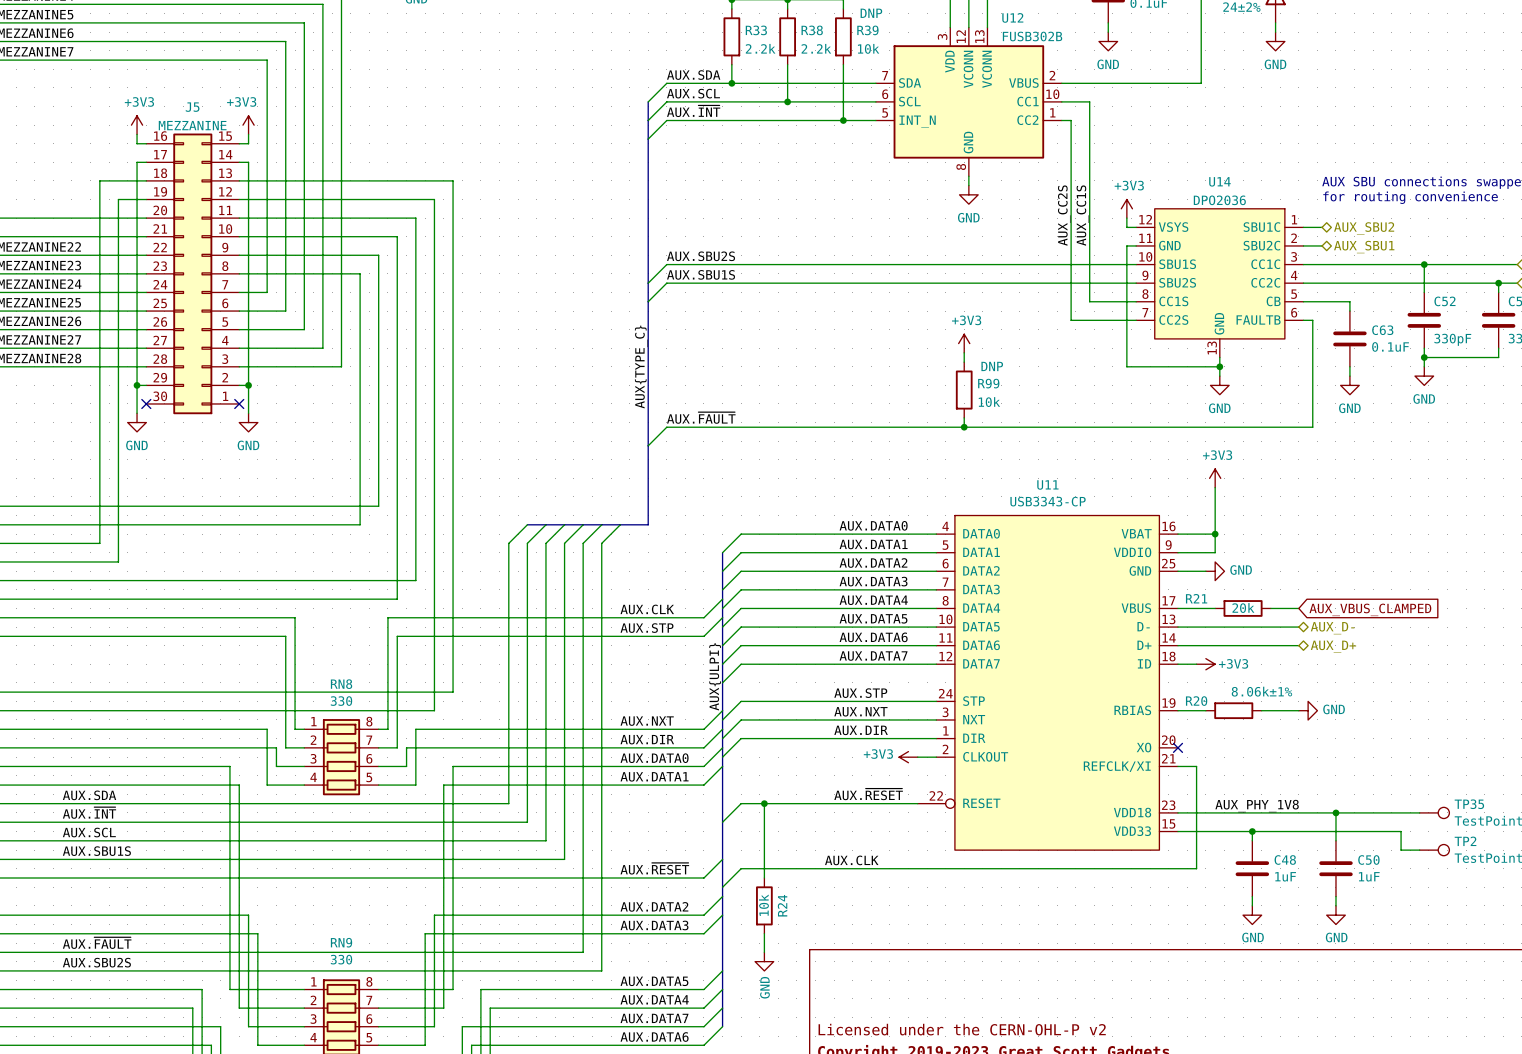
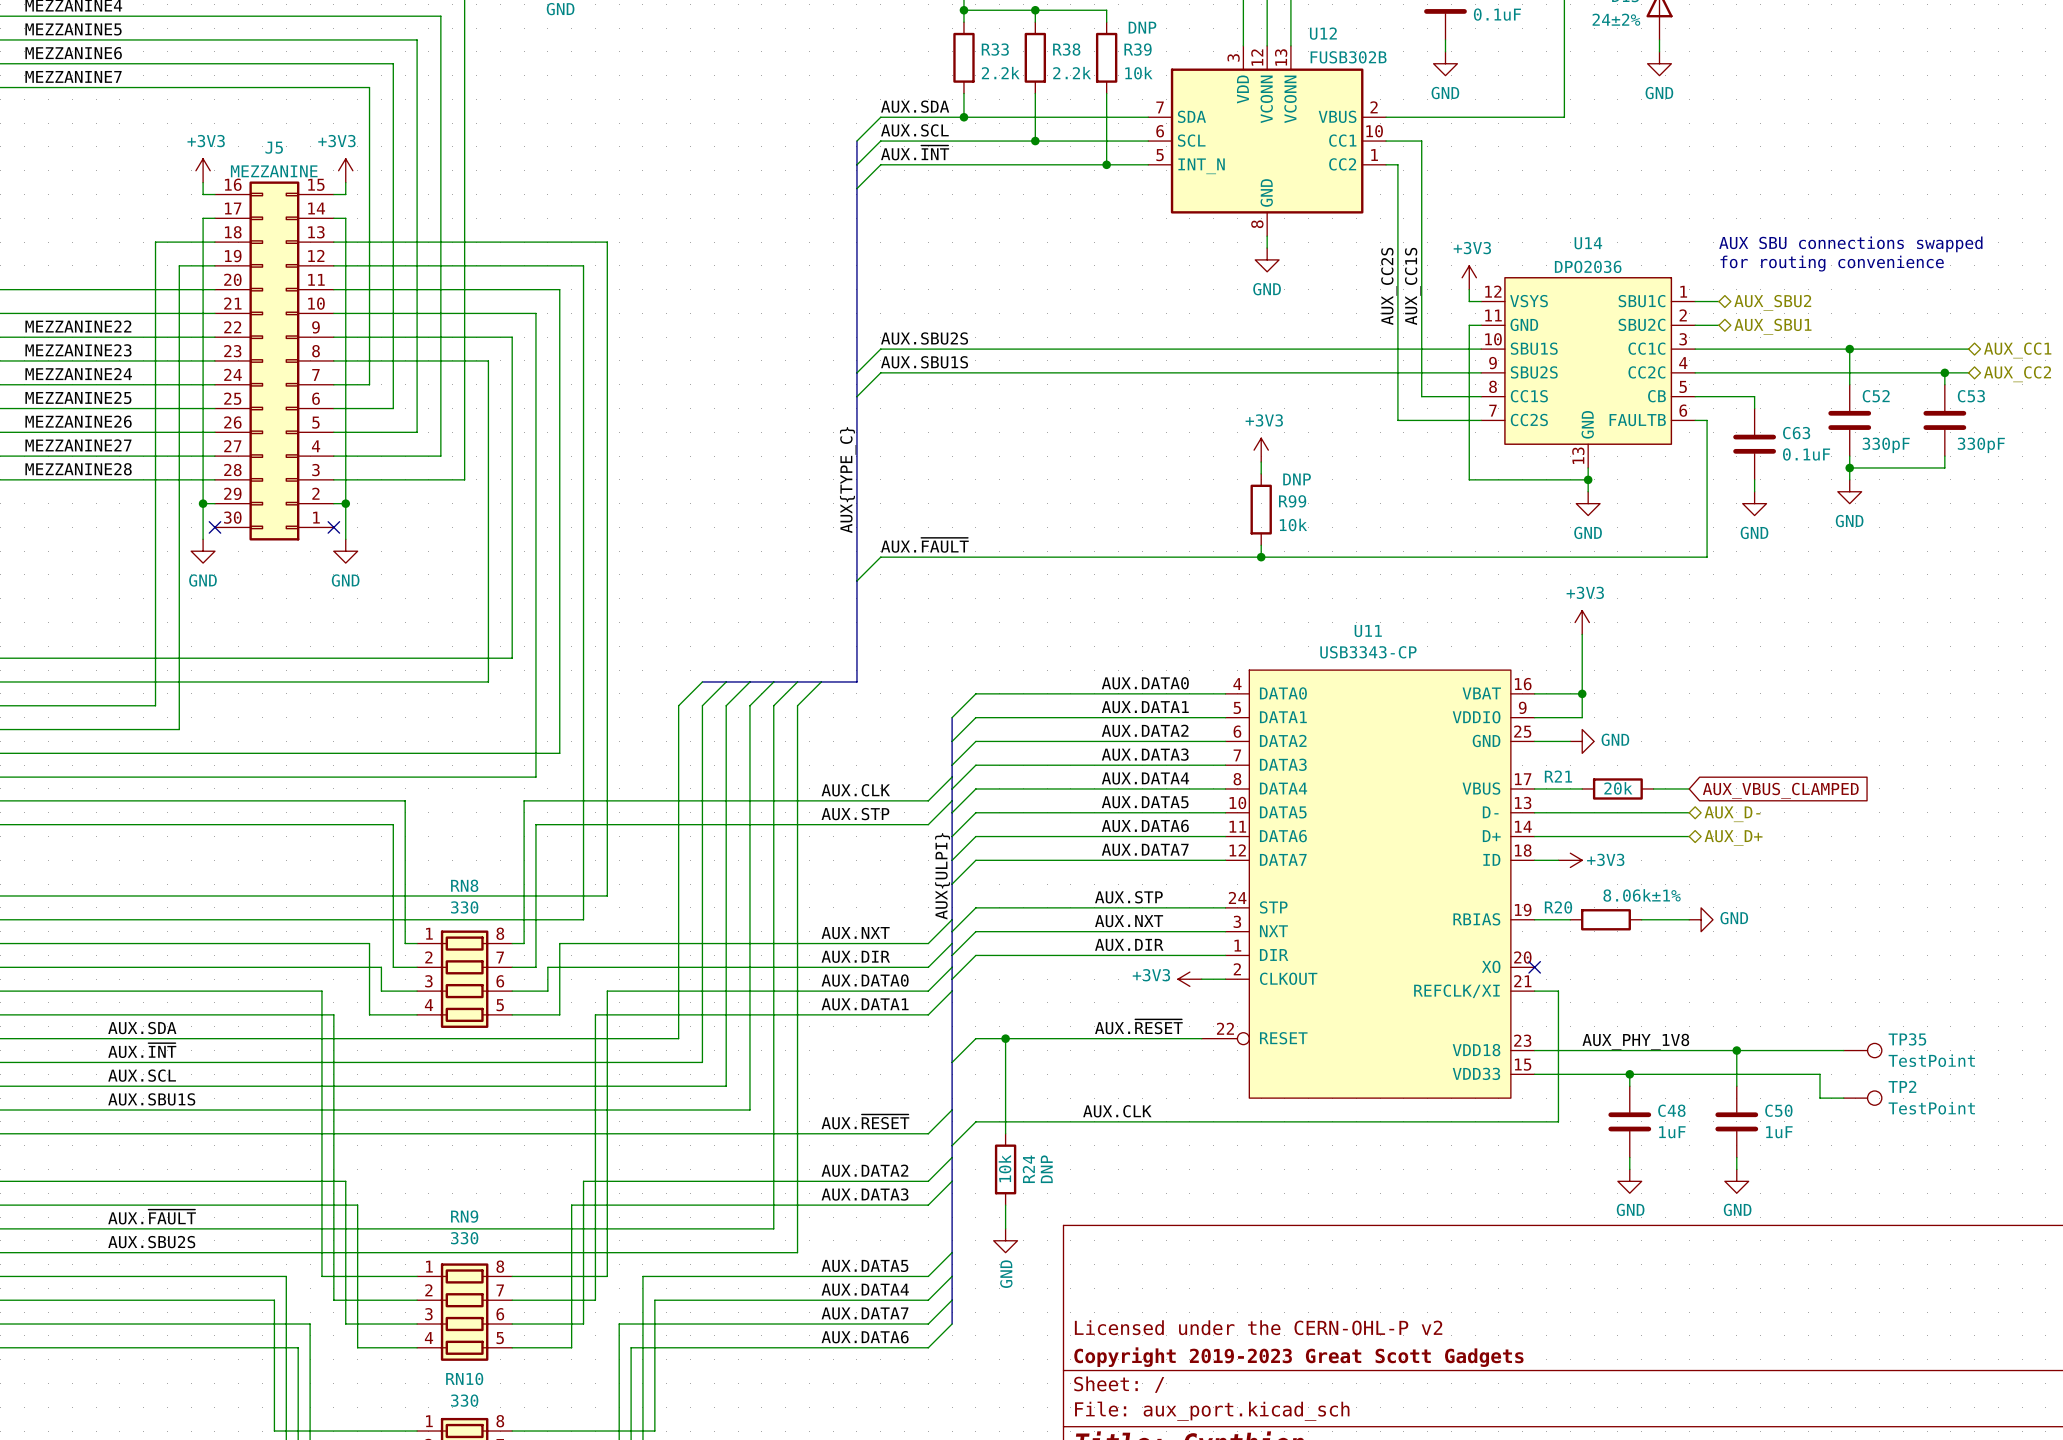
R24 text: none -> DNP (1046, 1169)

